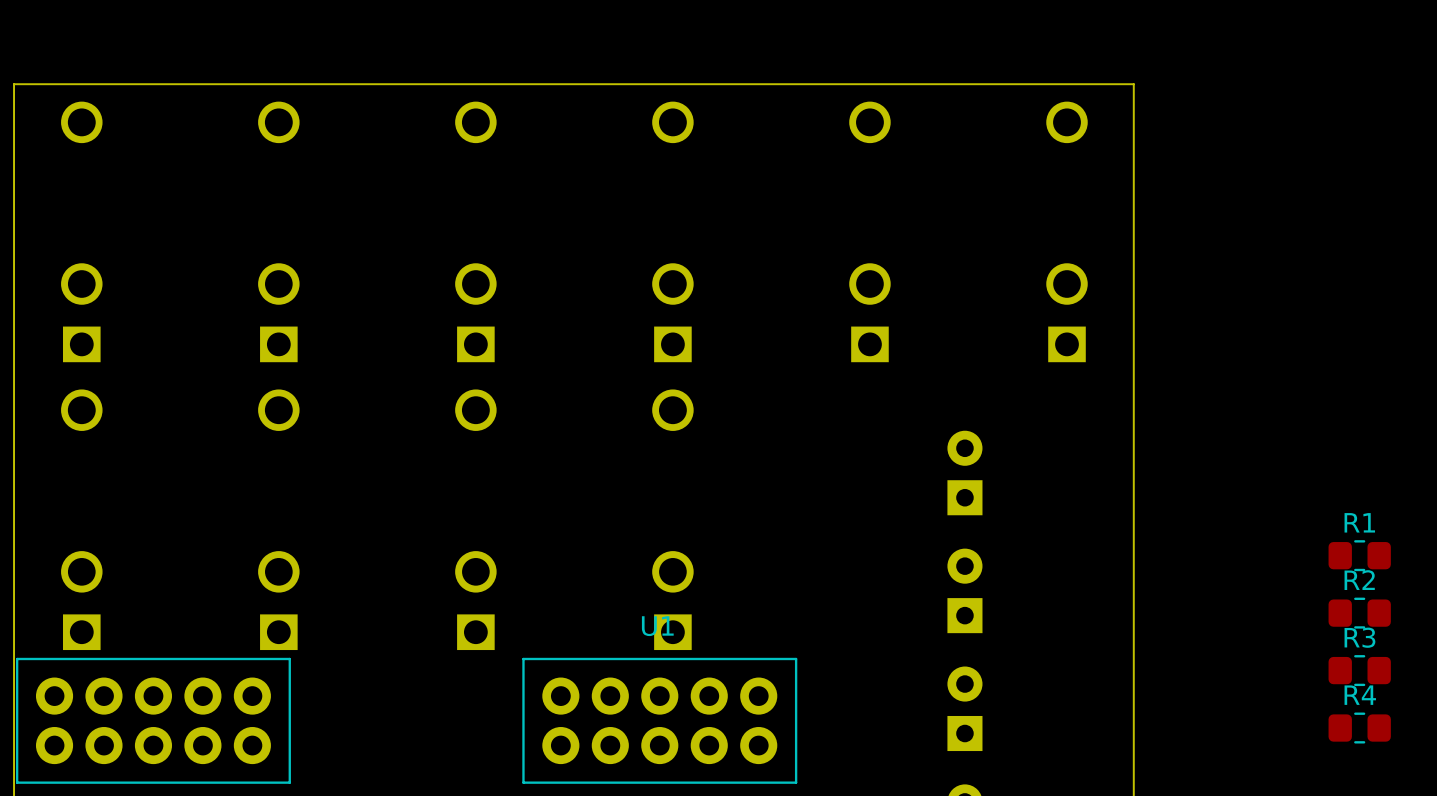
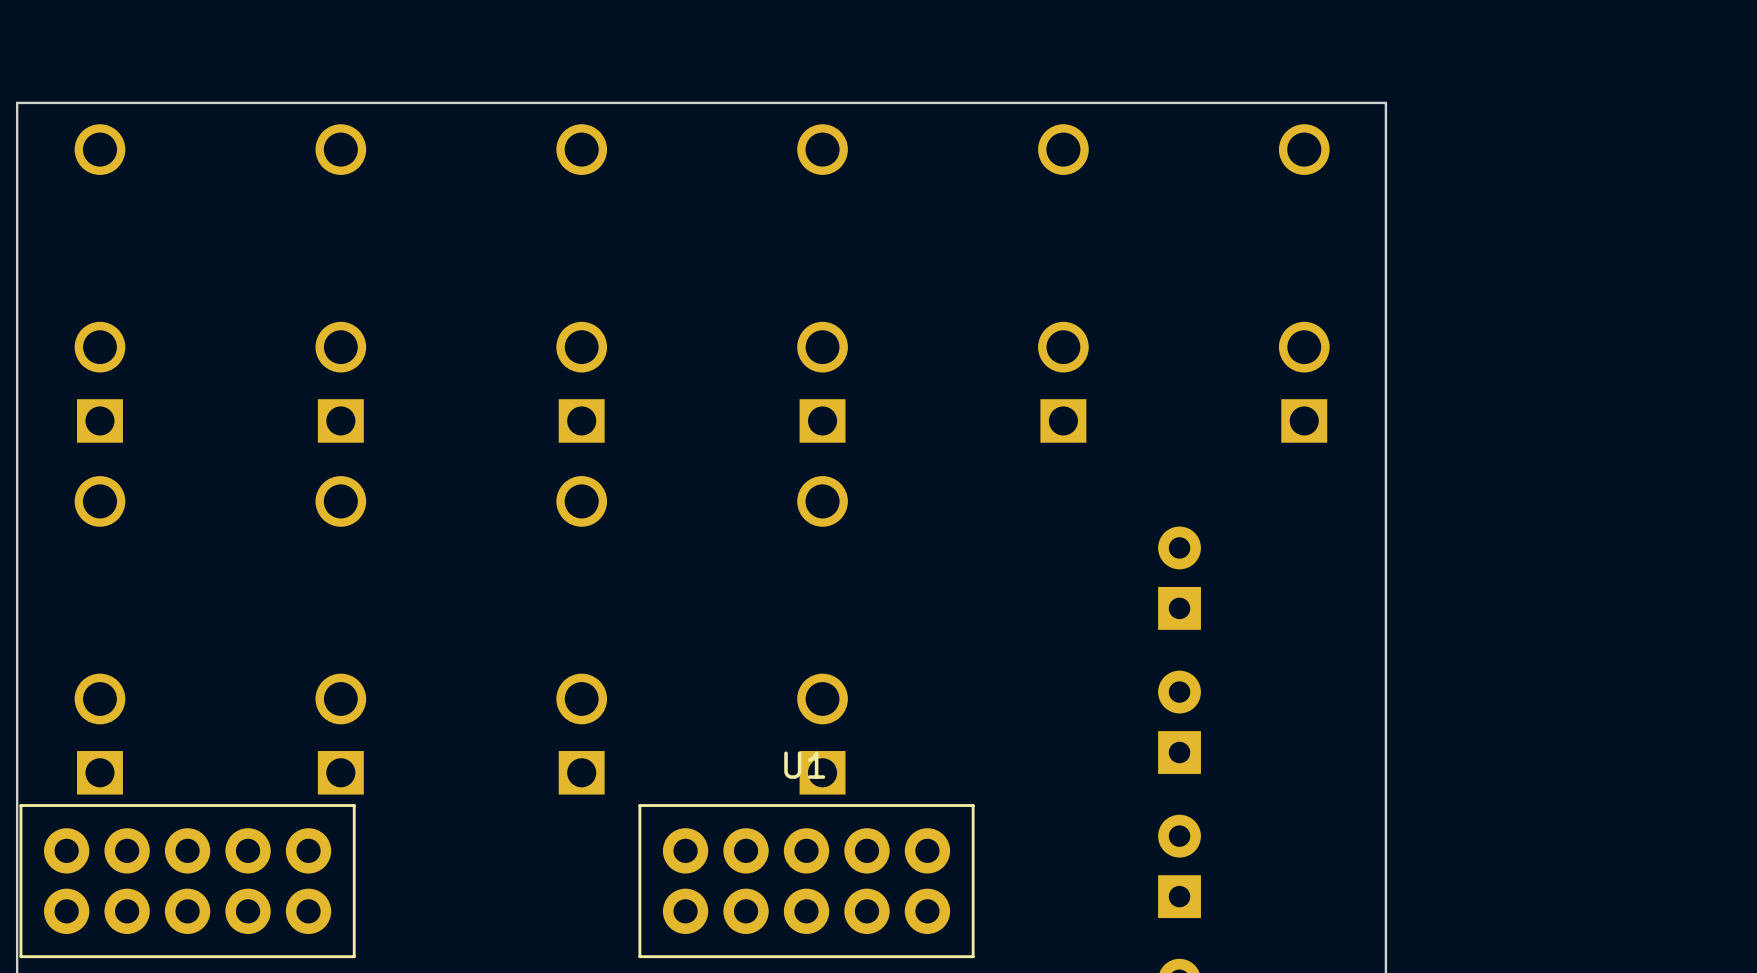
R1: (1359, 555) -> none
R2: (1359, 613) -> none
R3: (1359, 670) -> none
R4: (1359, 728) -> none

